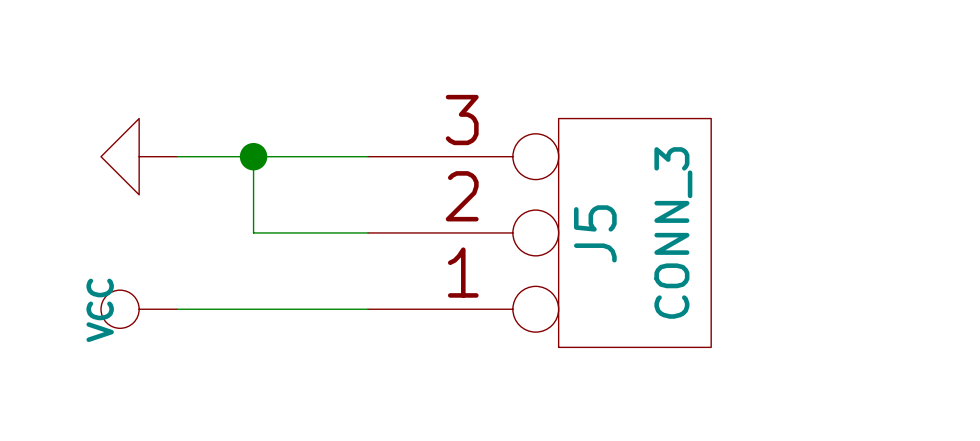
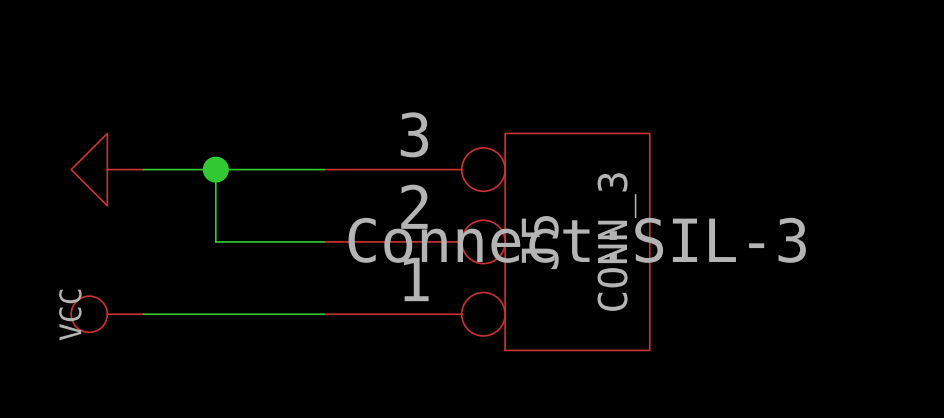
J5 text: none -> Connect:SIL-3 (577, 240)

